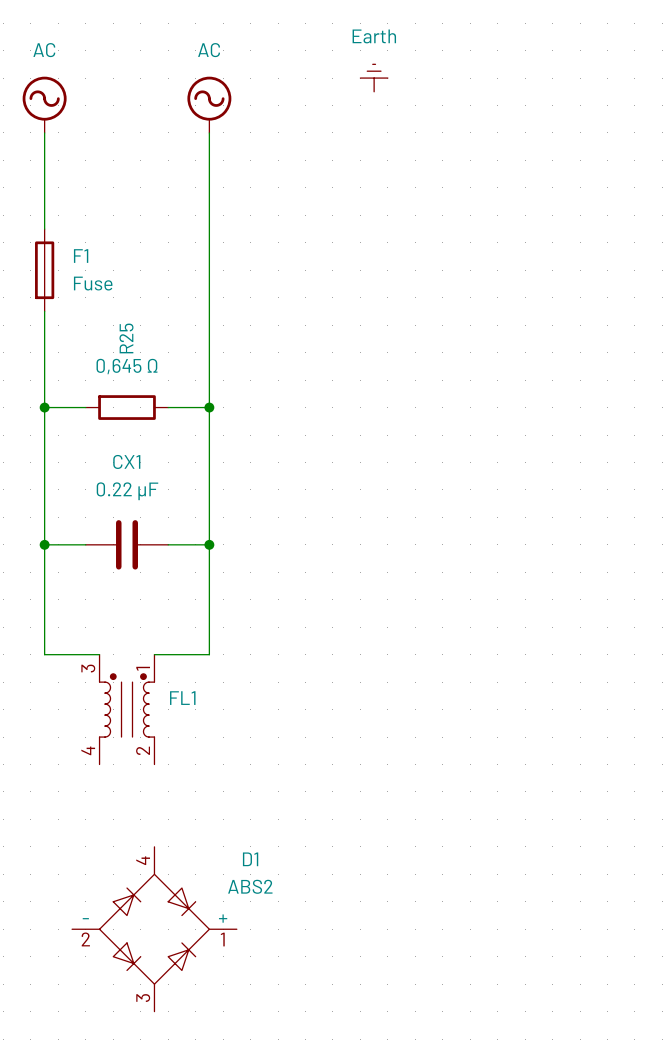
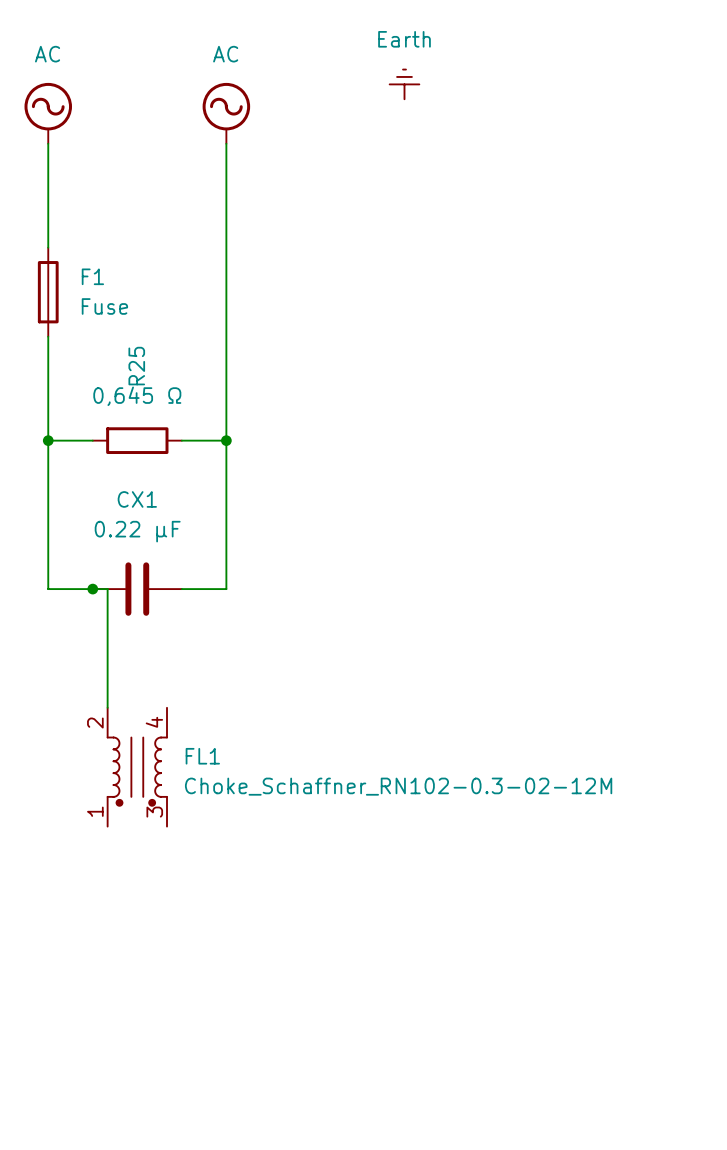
wire: (44, 544) (44, 654) (99, 654) -> (92, 589) (107, 589) (107, 707)
junction position: (44, 544) -> (92, 589)
wire: (209, 544) (209, 654) (154, 654) -> none
junction: (209, 544) -> none
FL1 rotation: 0° (127, 705) -> 180° (137, 771)
FL1 value: none -> Choke_Schaffner_RN102-0.3-02-12M (398, 786)
D1: ABS2 (154, 929) -> none

